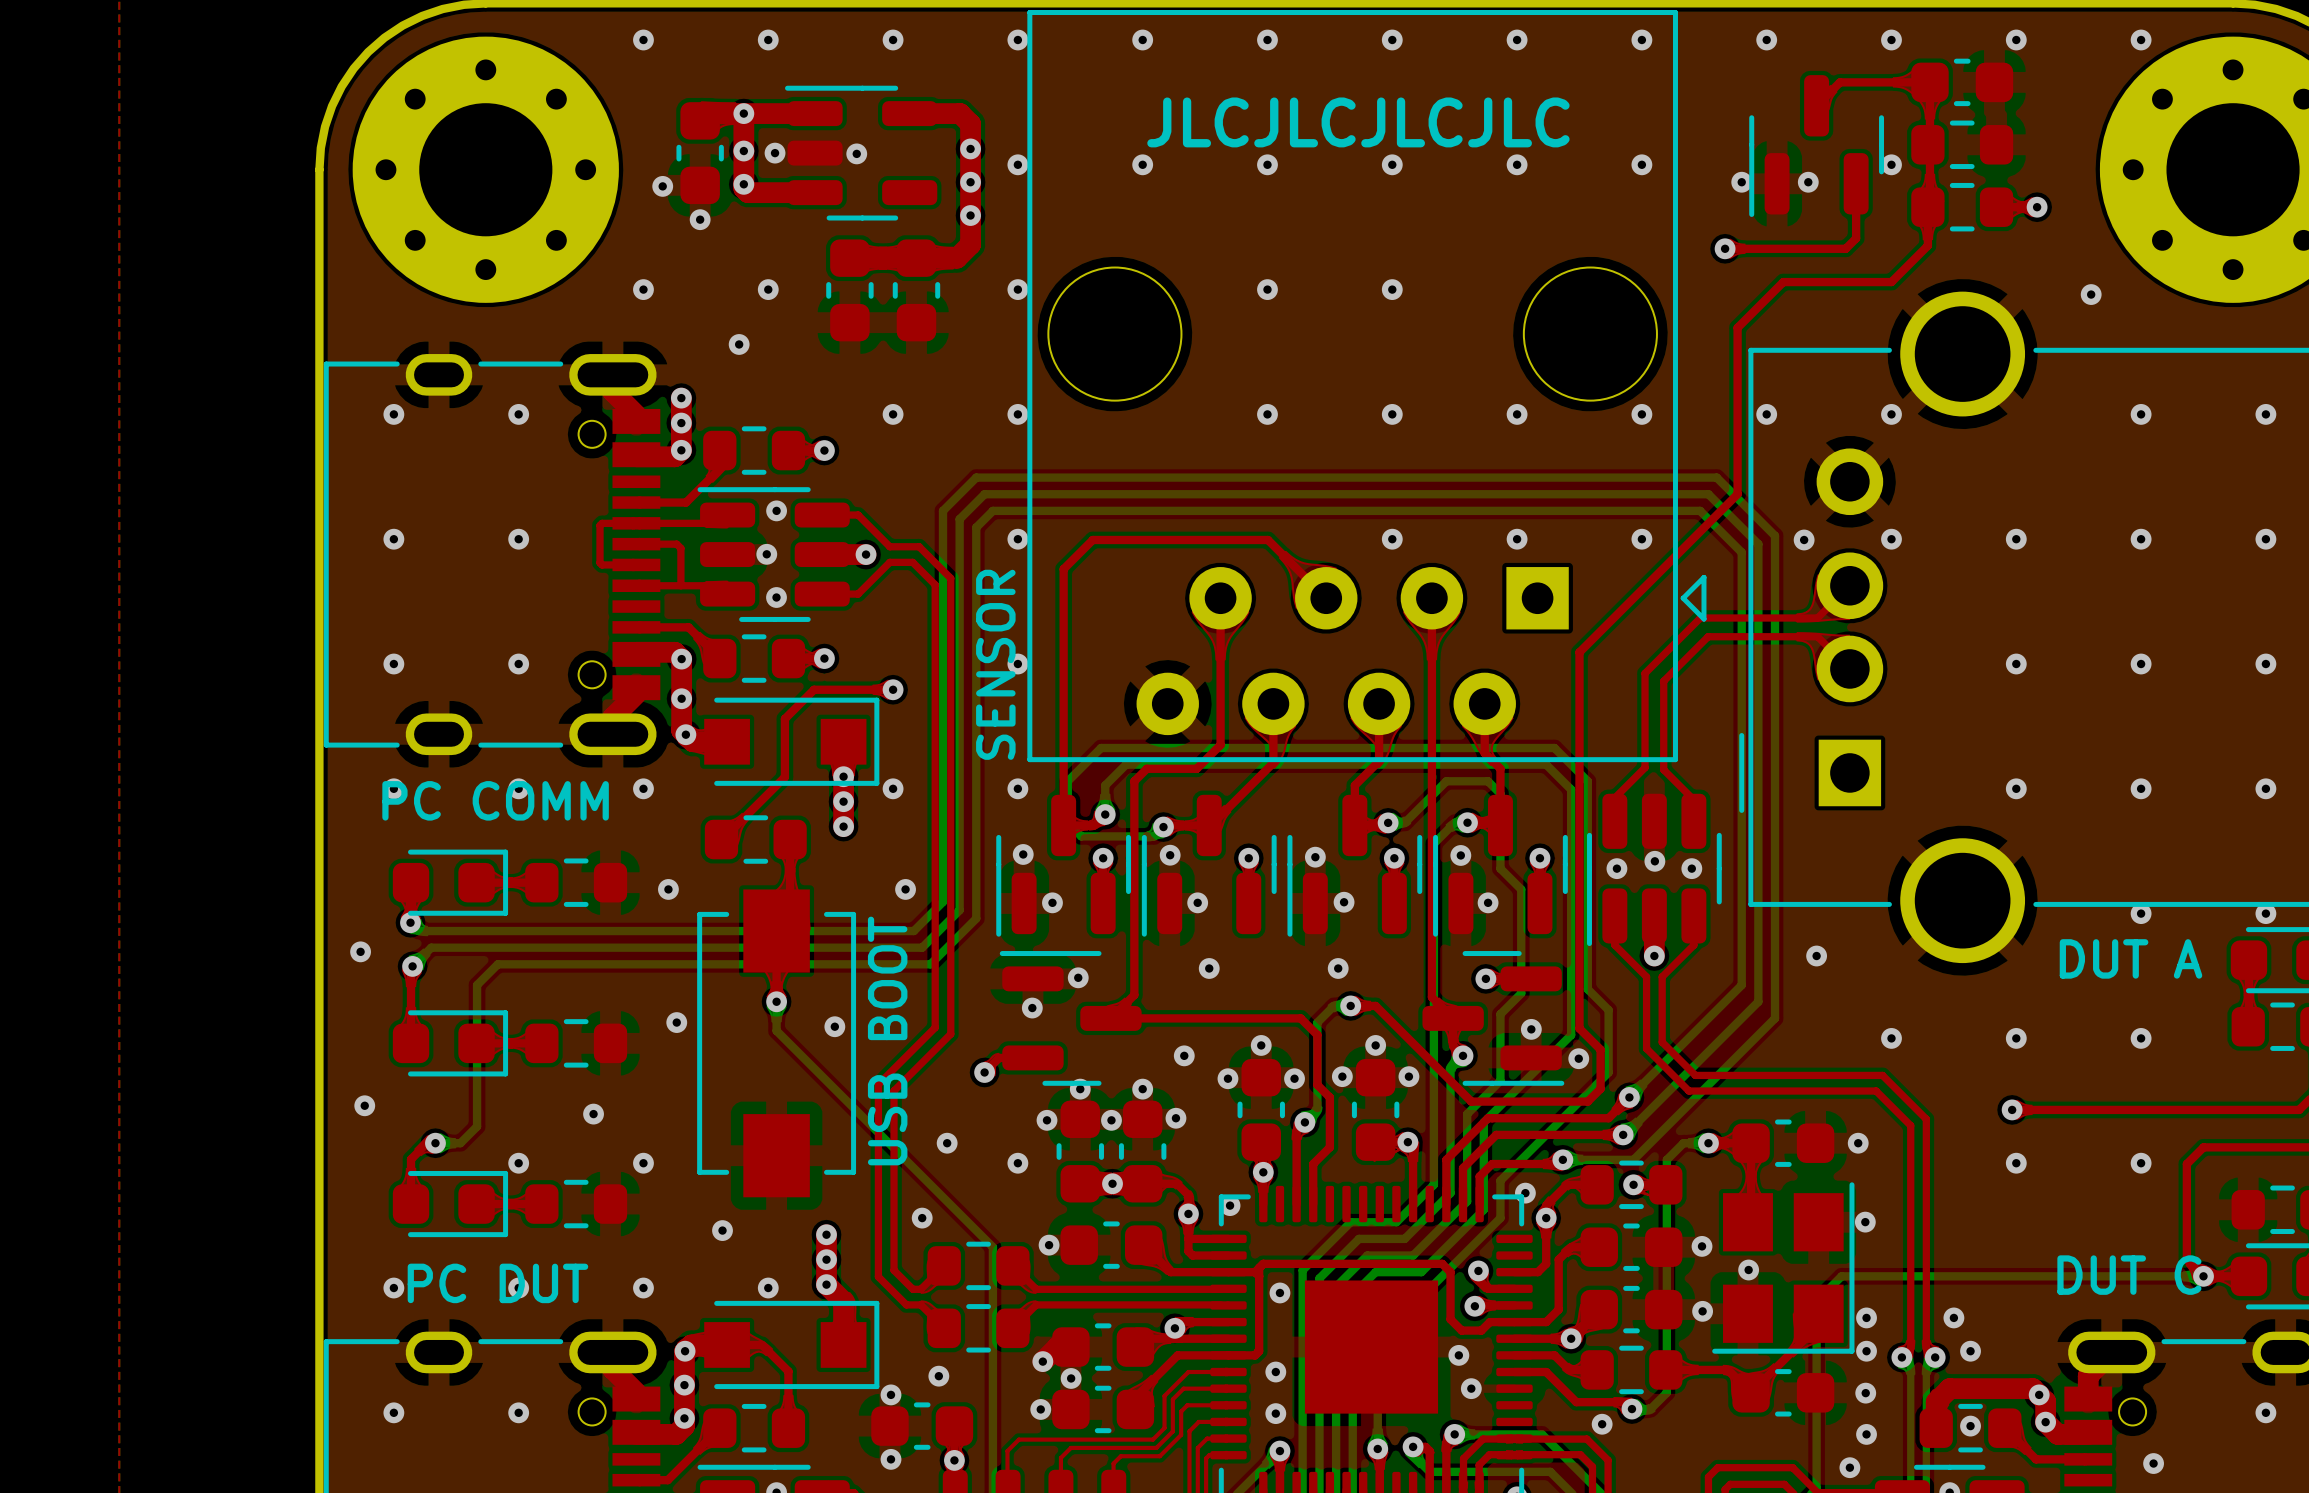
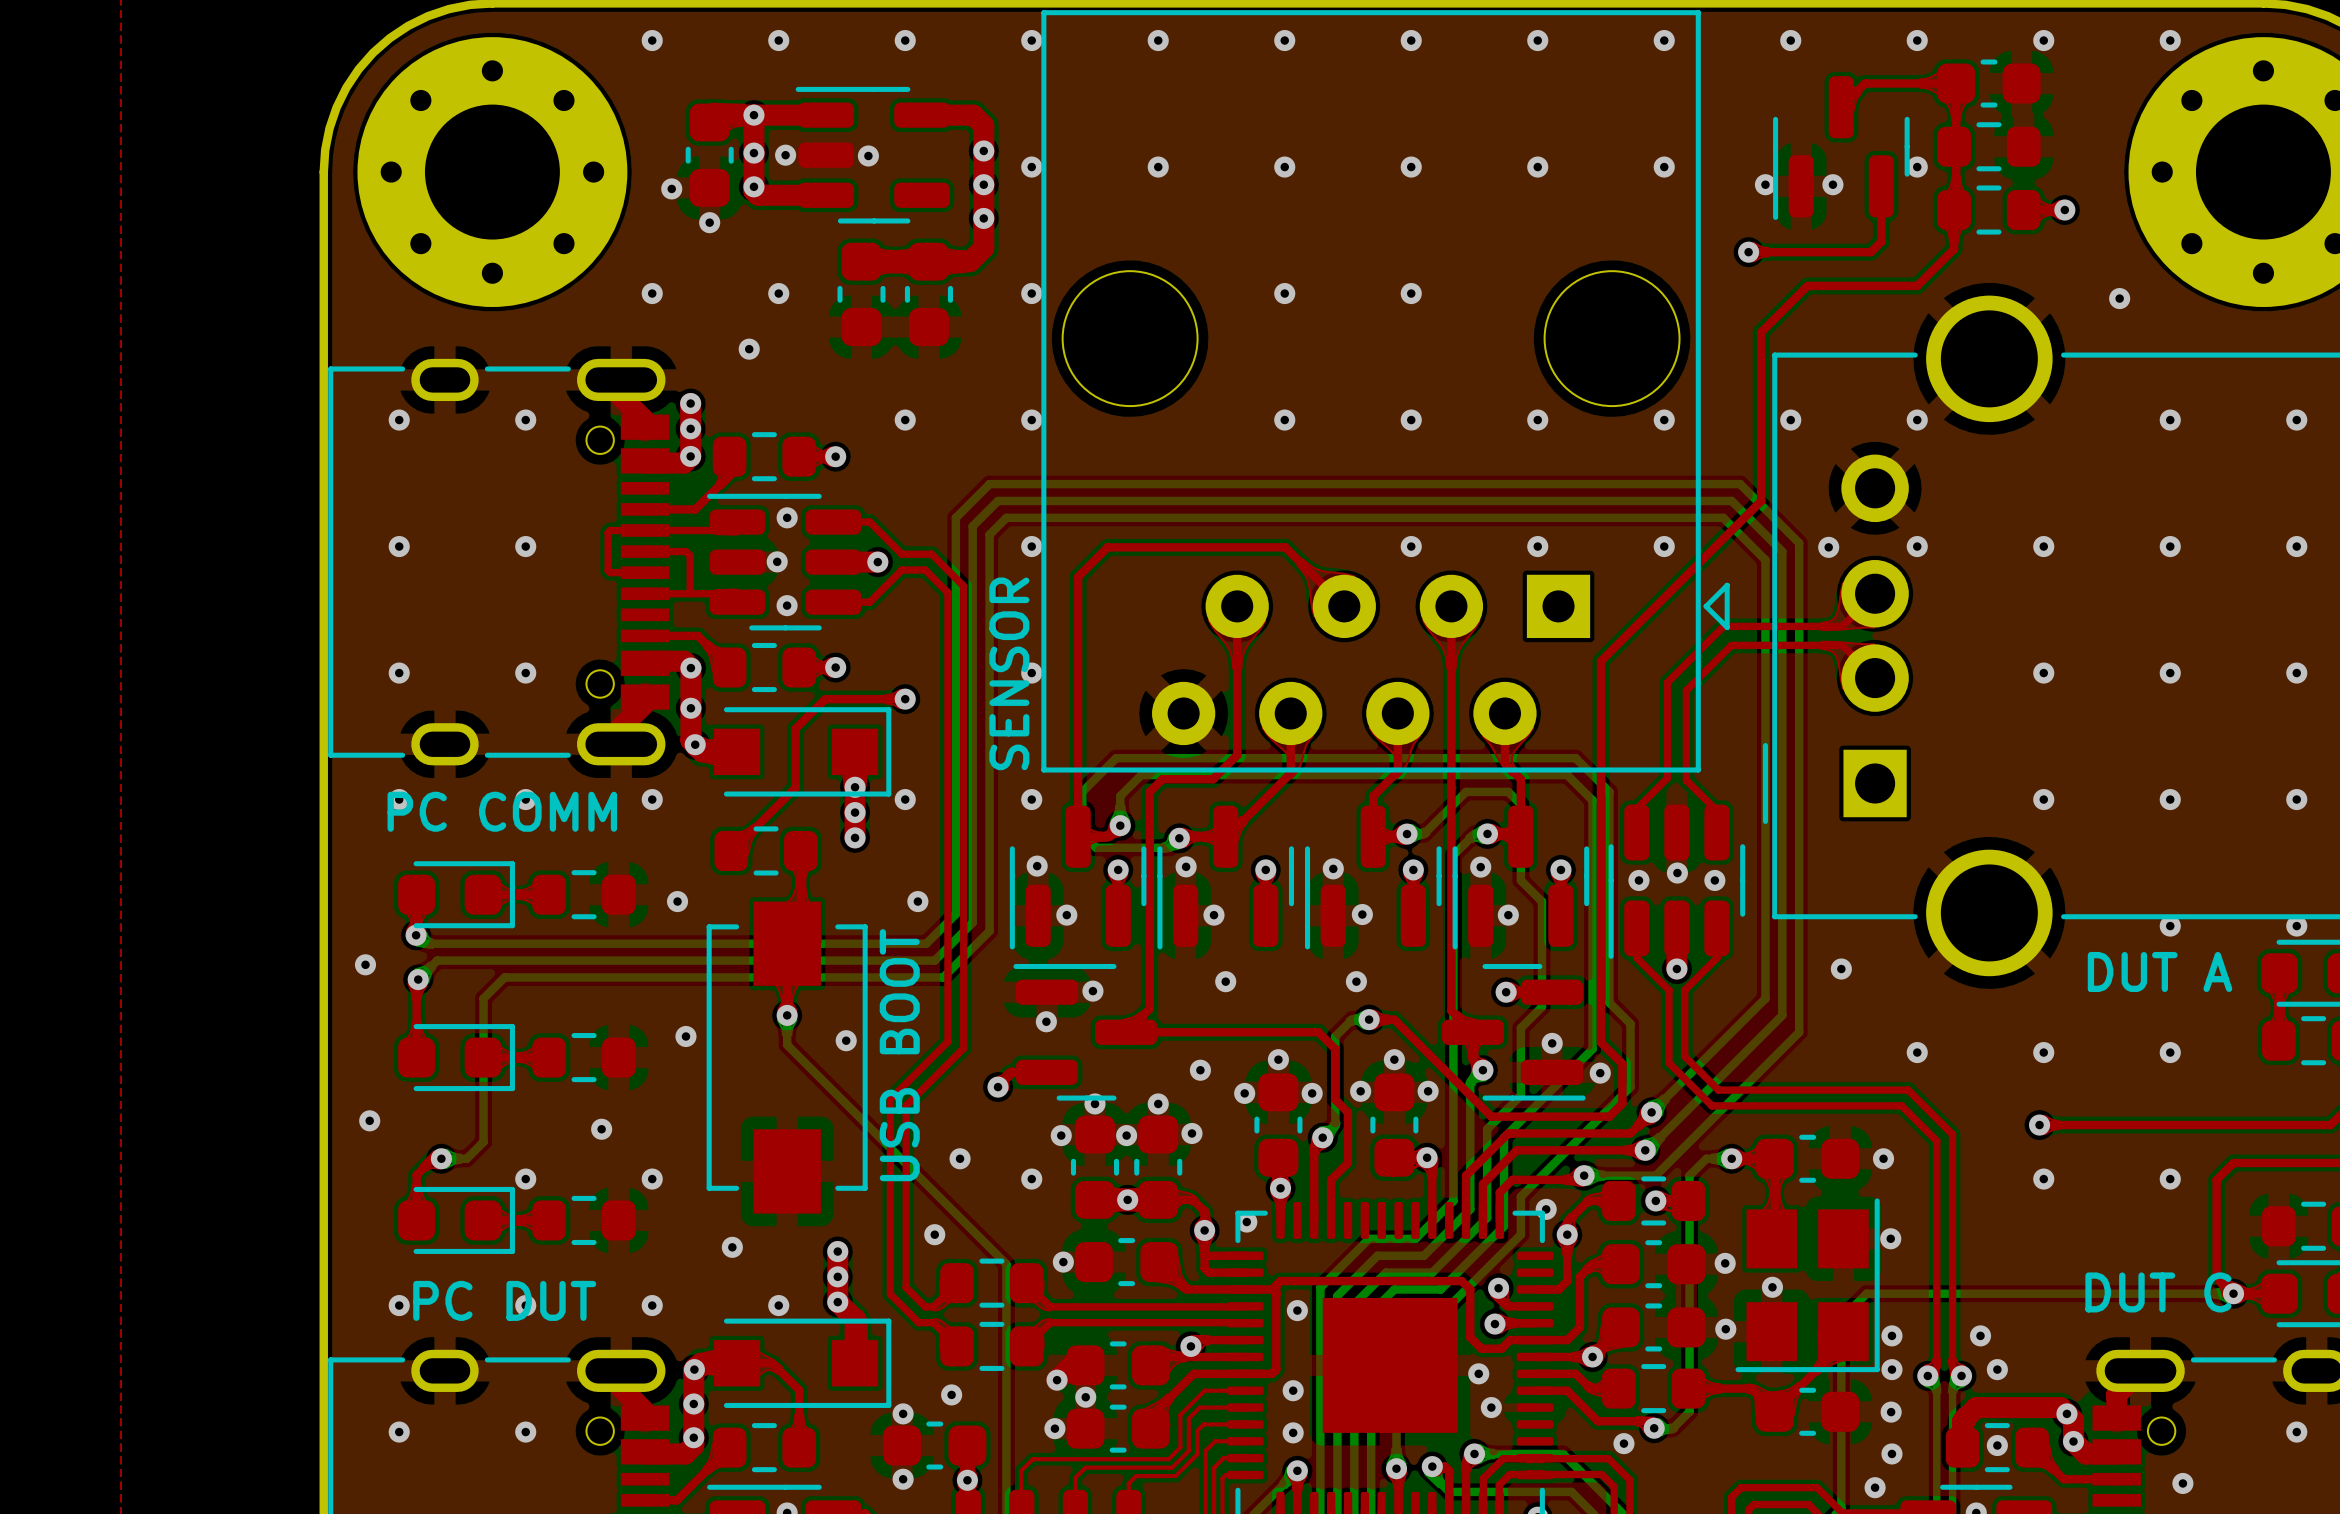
text: JLCJLCJLCJLC (1358, 122) -> none

